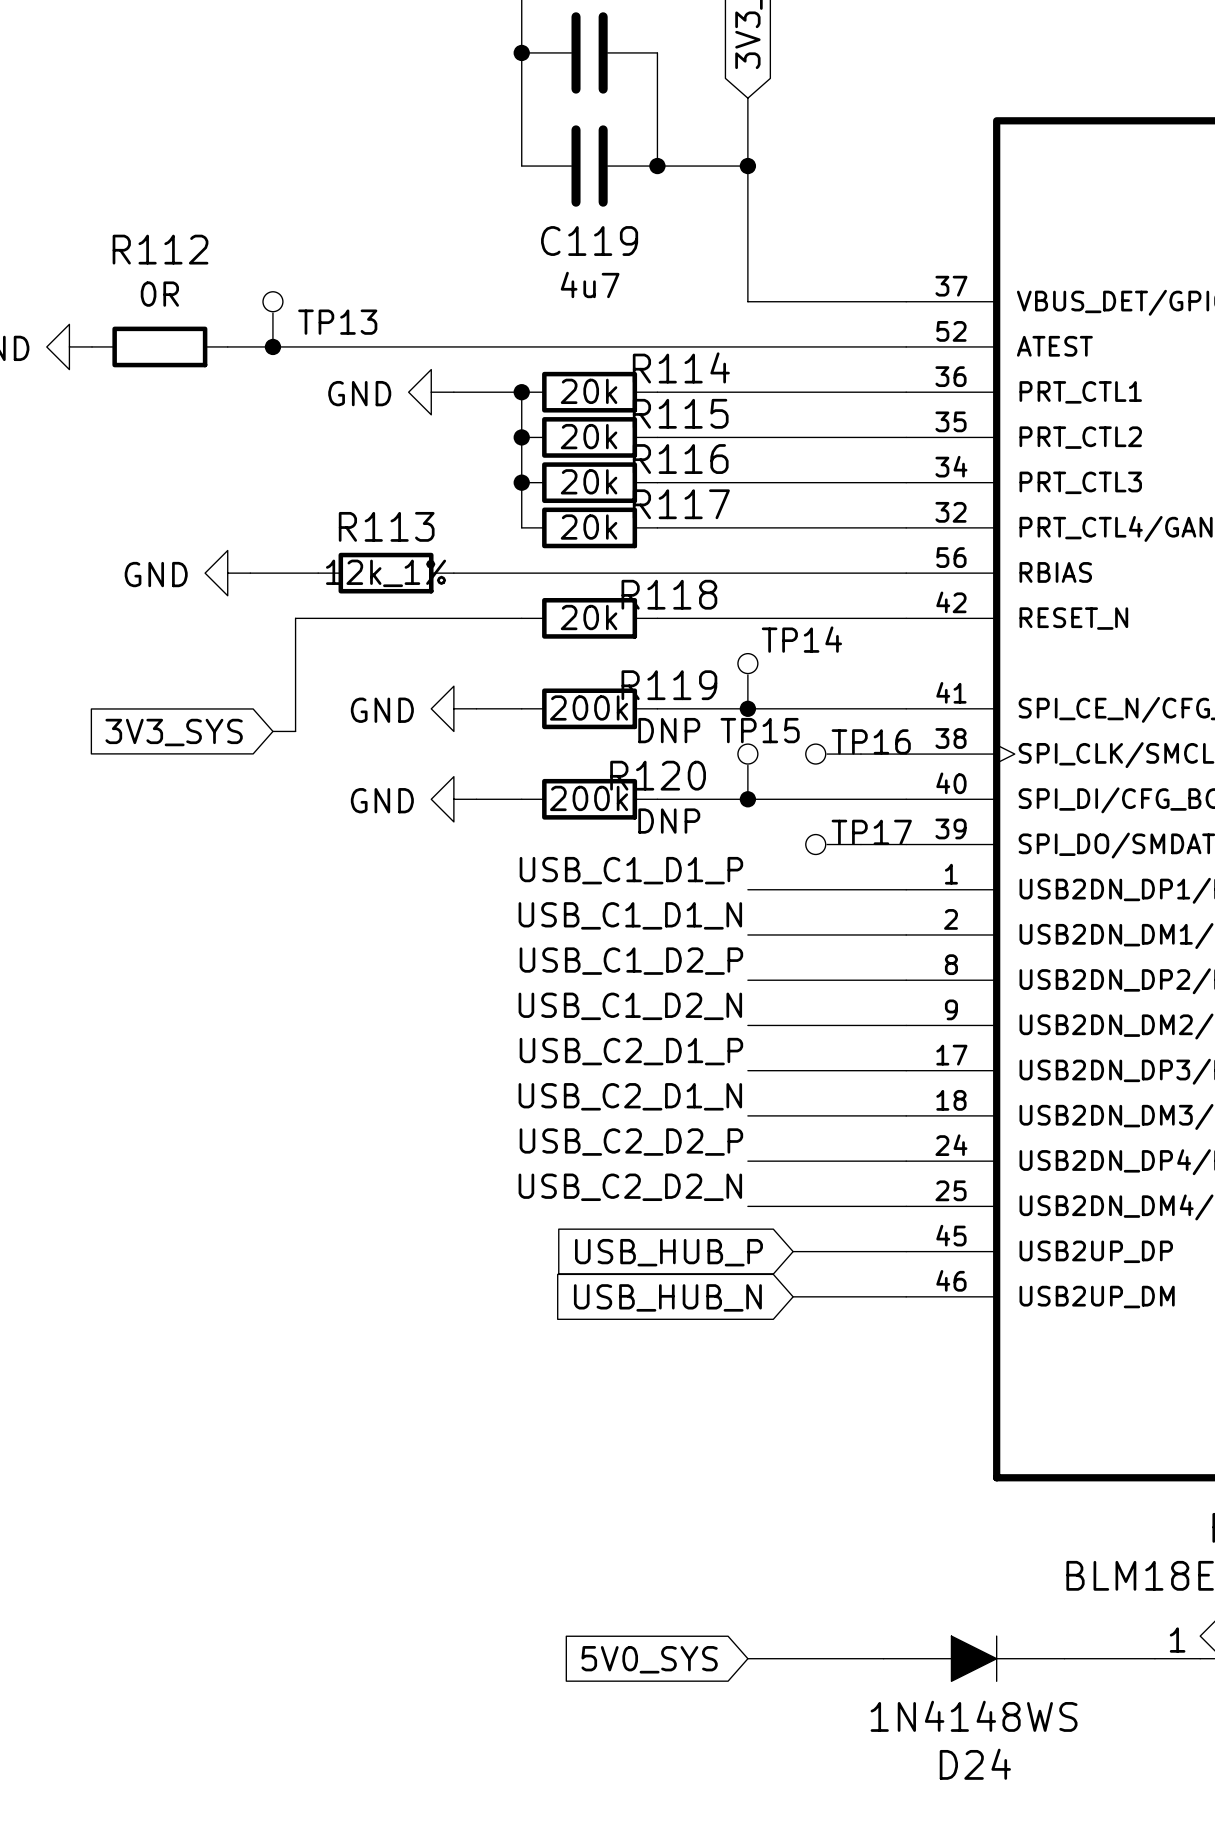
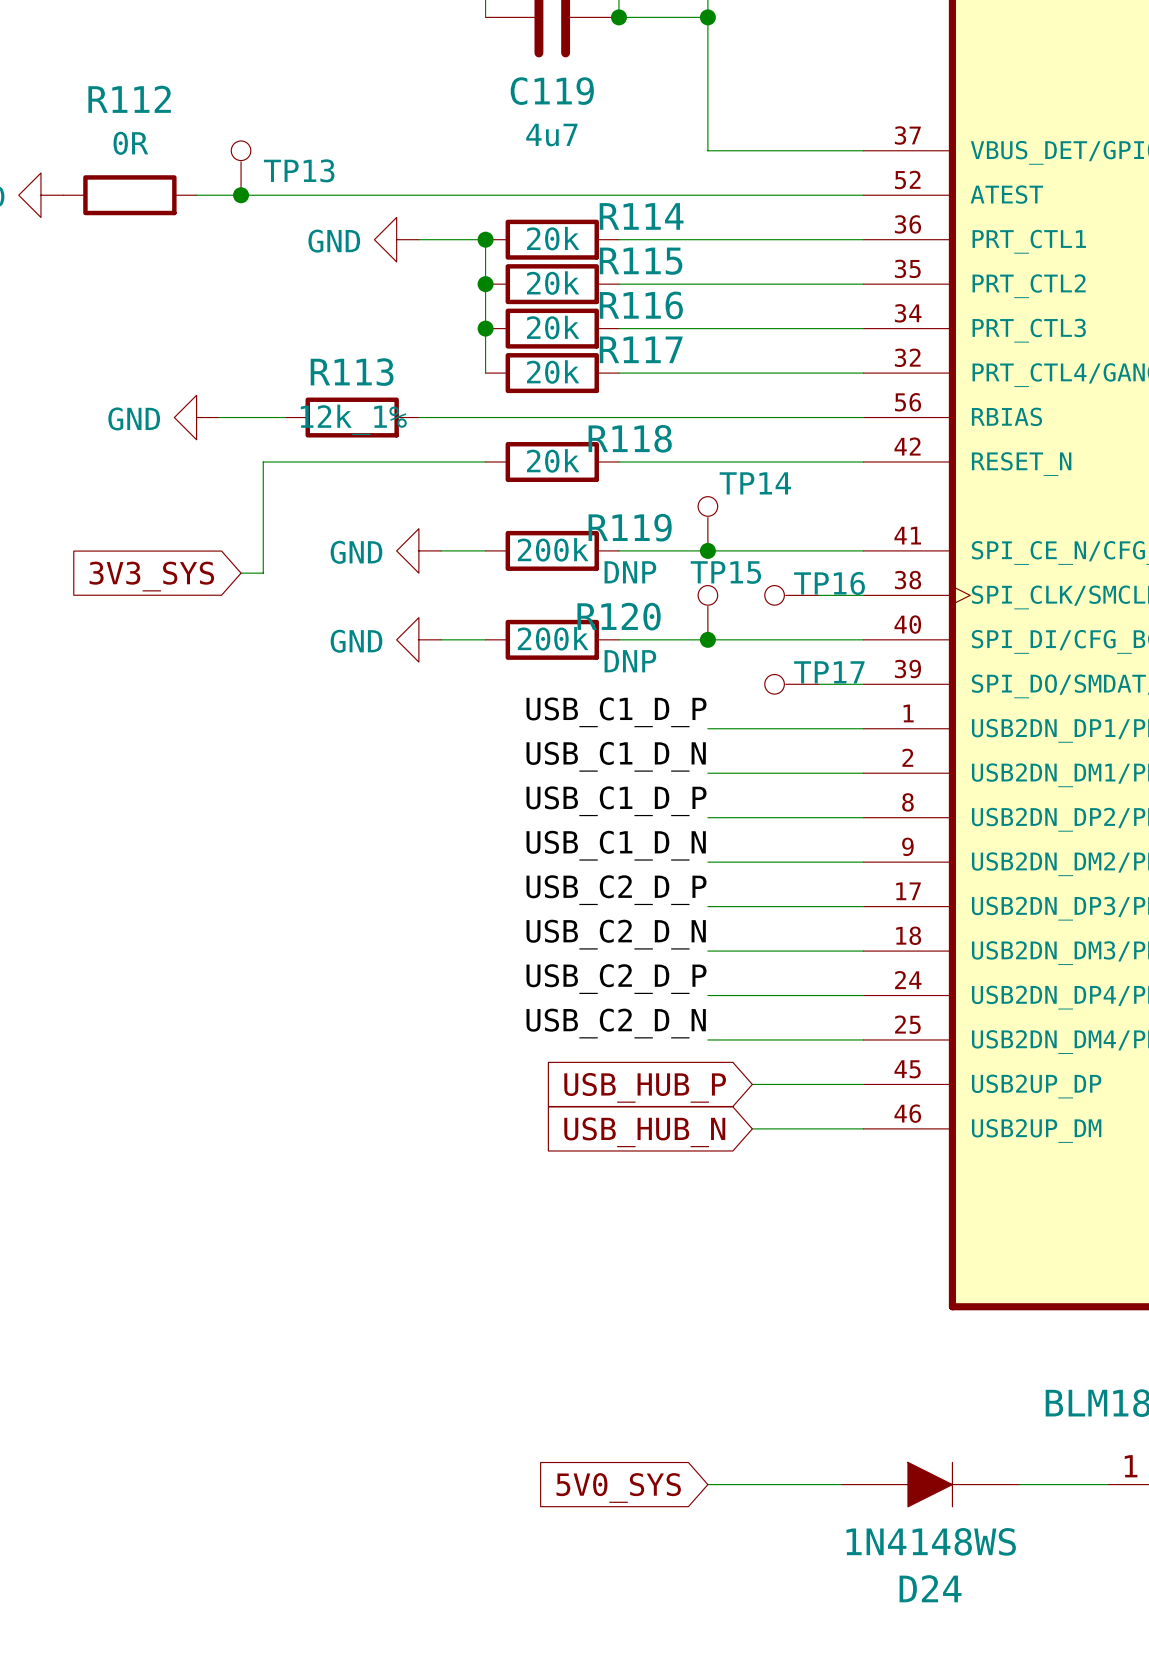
label: USB_C1_D1_P (631, 870) -> USB_C1_D_P (616, 712)
label: USB_C1_D1_N (630, 915) -> USB_C1_D_N (616, 756)
label: USB_C1_D2_P (631, 961) -> USB_C1_D_P (616, 801)
label: USB_C1_D2_N (630, 1006) -> USB_C1_D_N (616, 845)
label: USB_C2_D1_P (631, 1051) -> USB_C2_D_P (616, 890)
label: USB_C2_D1_N (630, 1096) -> USB_C2_D_N (616, 934)
label: USB_C2_D2_P (631, 1142) -> USB_C2_D_P (616, 979)
label: USB_C2_D2_N (630, 1187) -> USB_C2_D_N (616, 1023)

